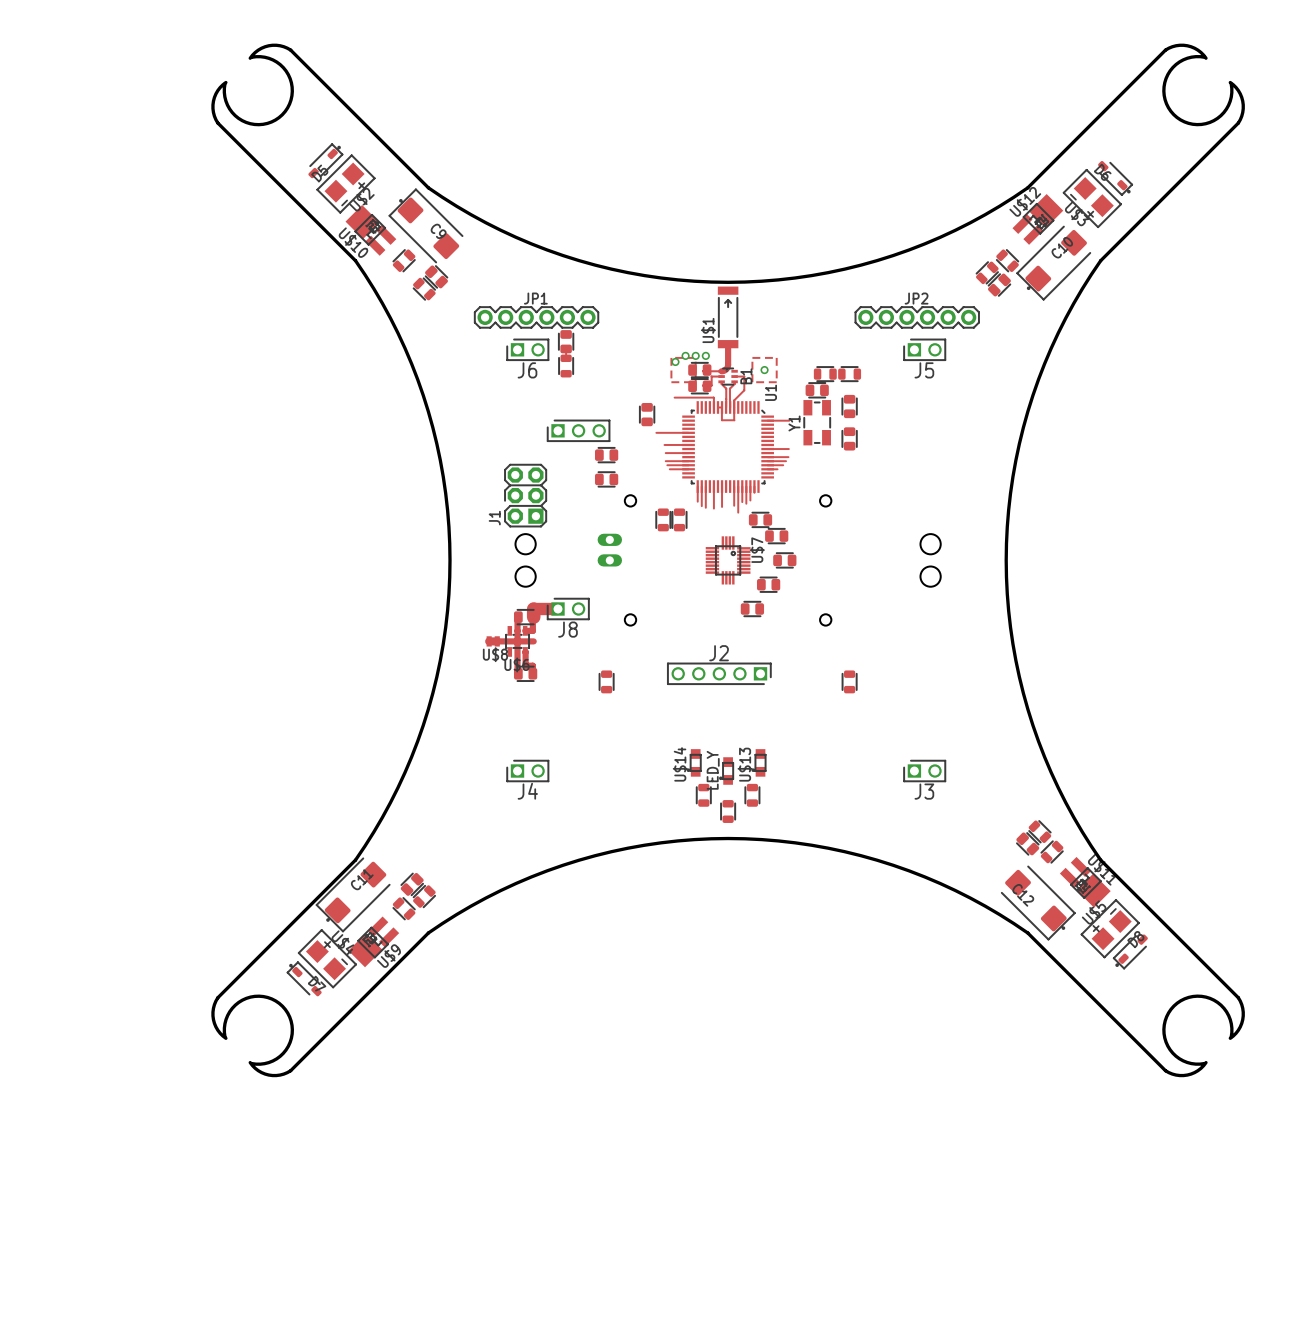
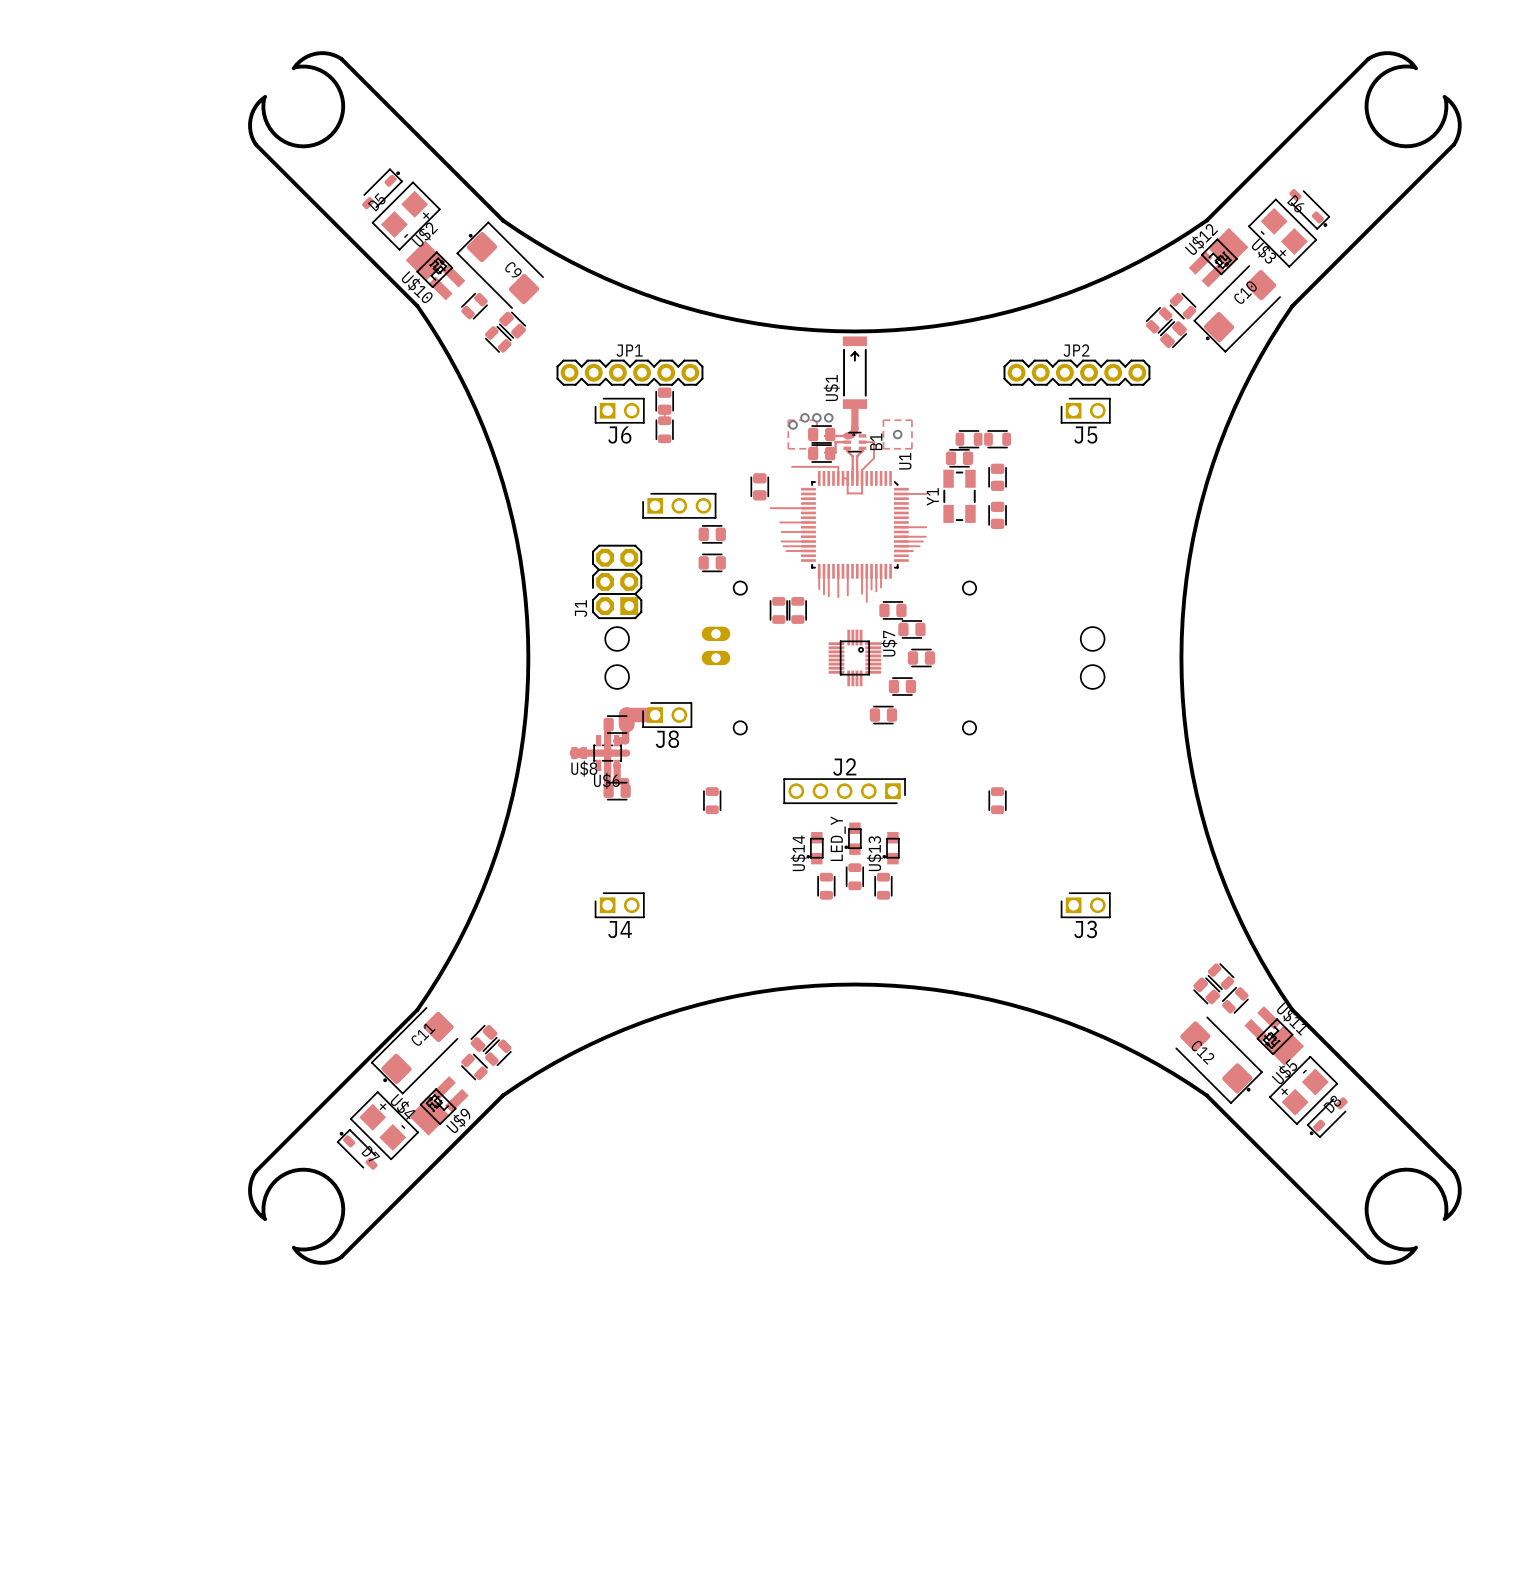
part: none -> (854, 876)
part: none -> (826, 886)
part: none -> (883, 886)
U$14 position: (694, 762) -> (815, 848)
U$13 position: (759, 762) -> (891, 848)
LED_Y position: (726, 771) -> (853, 838)
part: (703, 795) -> none
part: (752, 795) -> none
part: (728, 811) -> none

